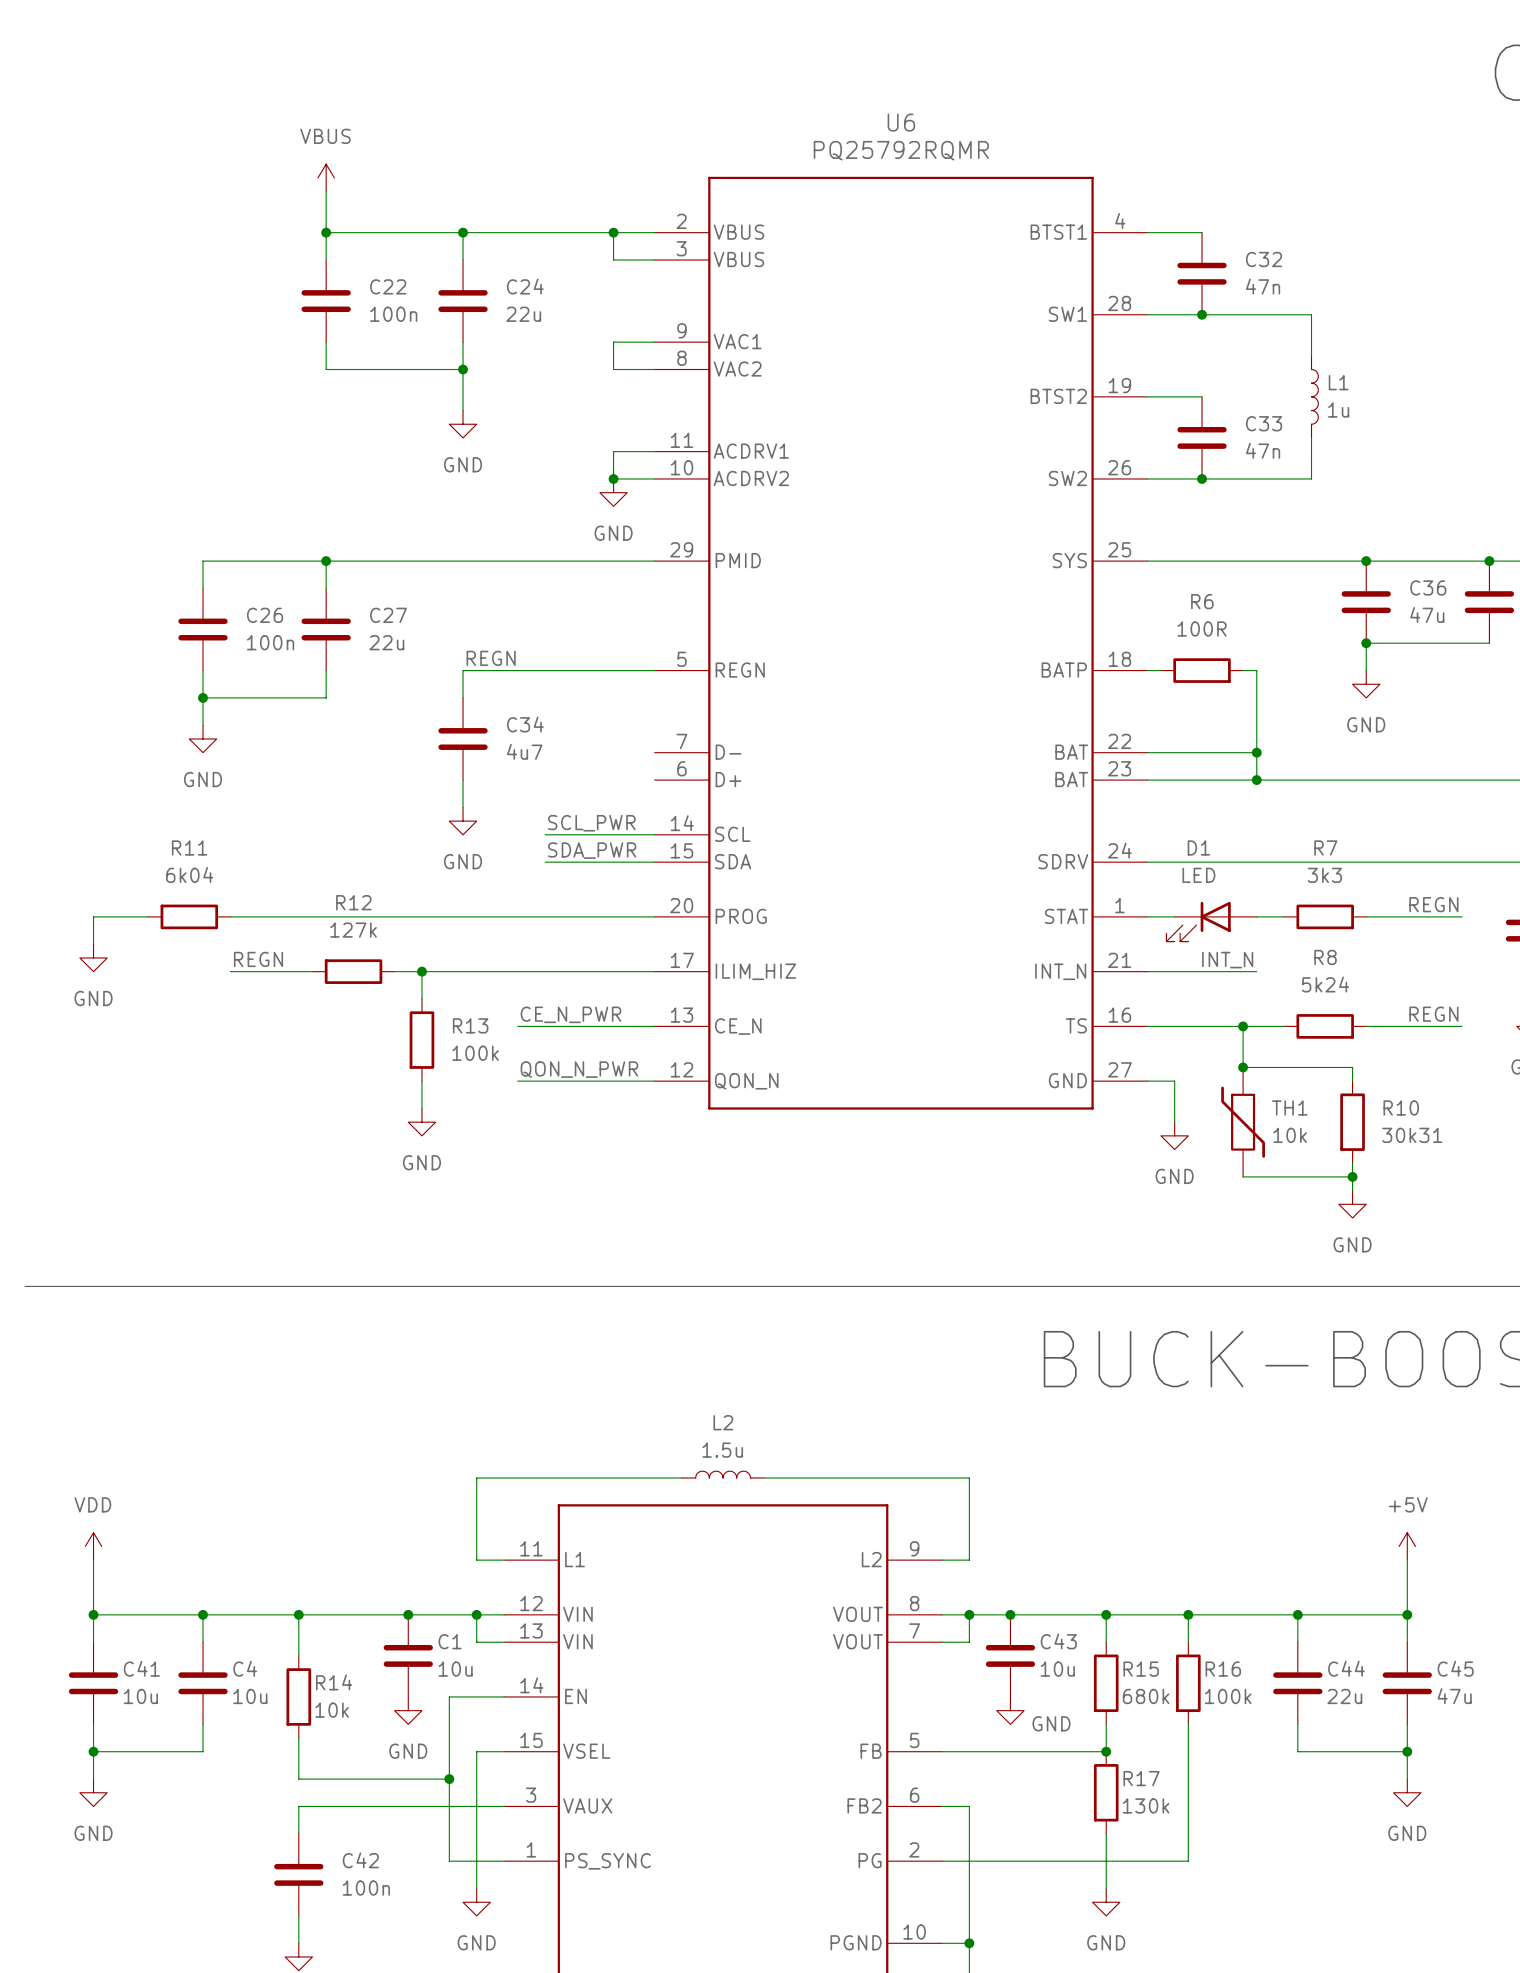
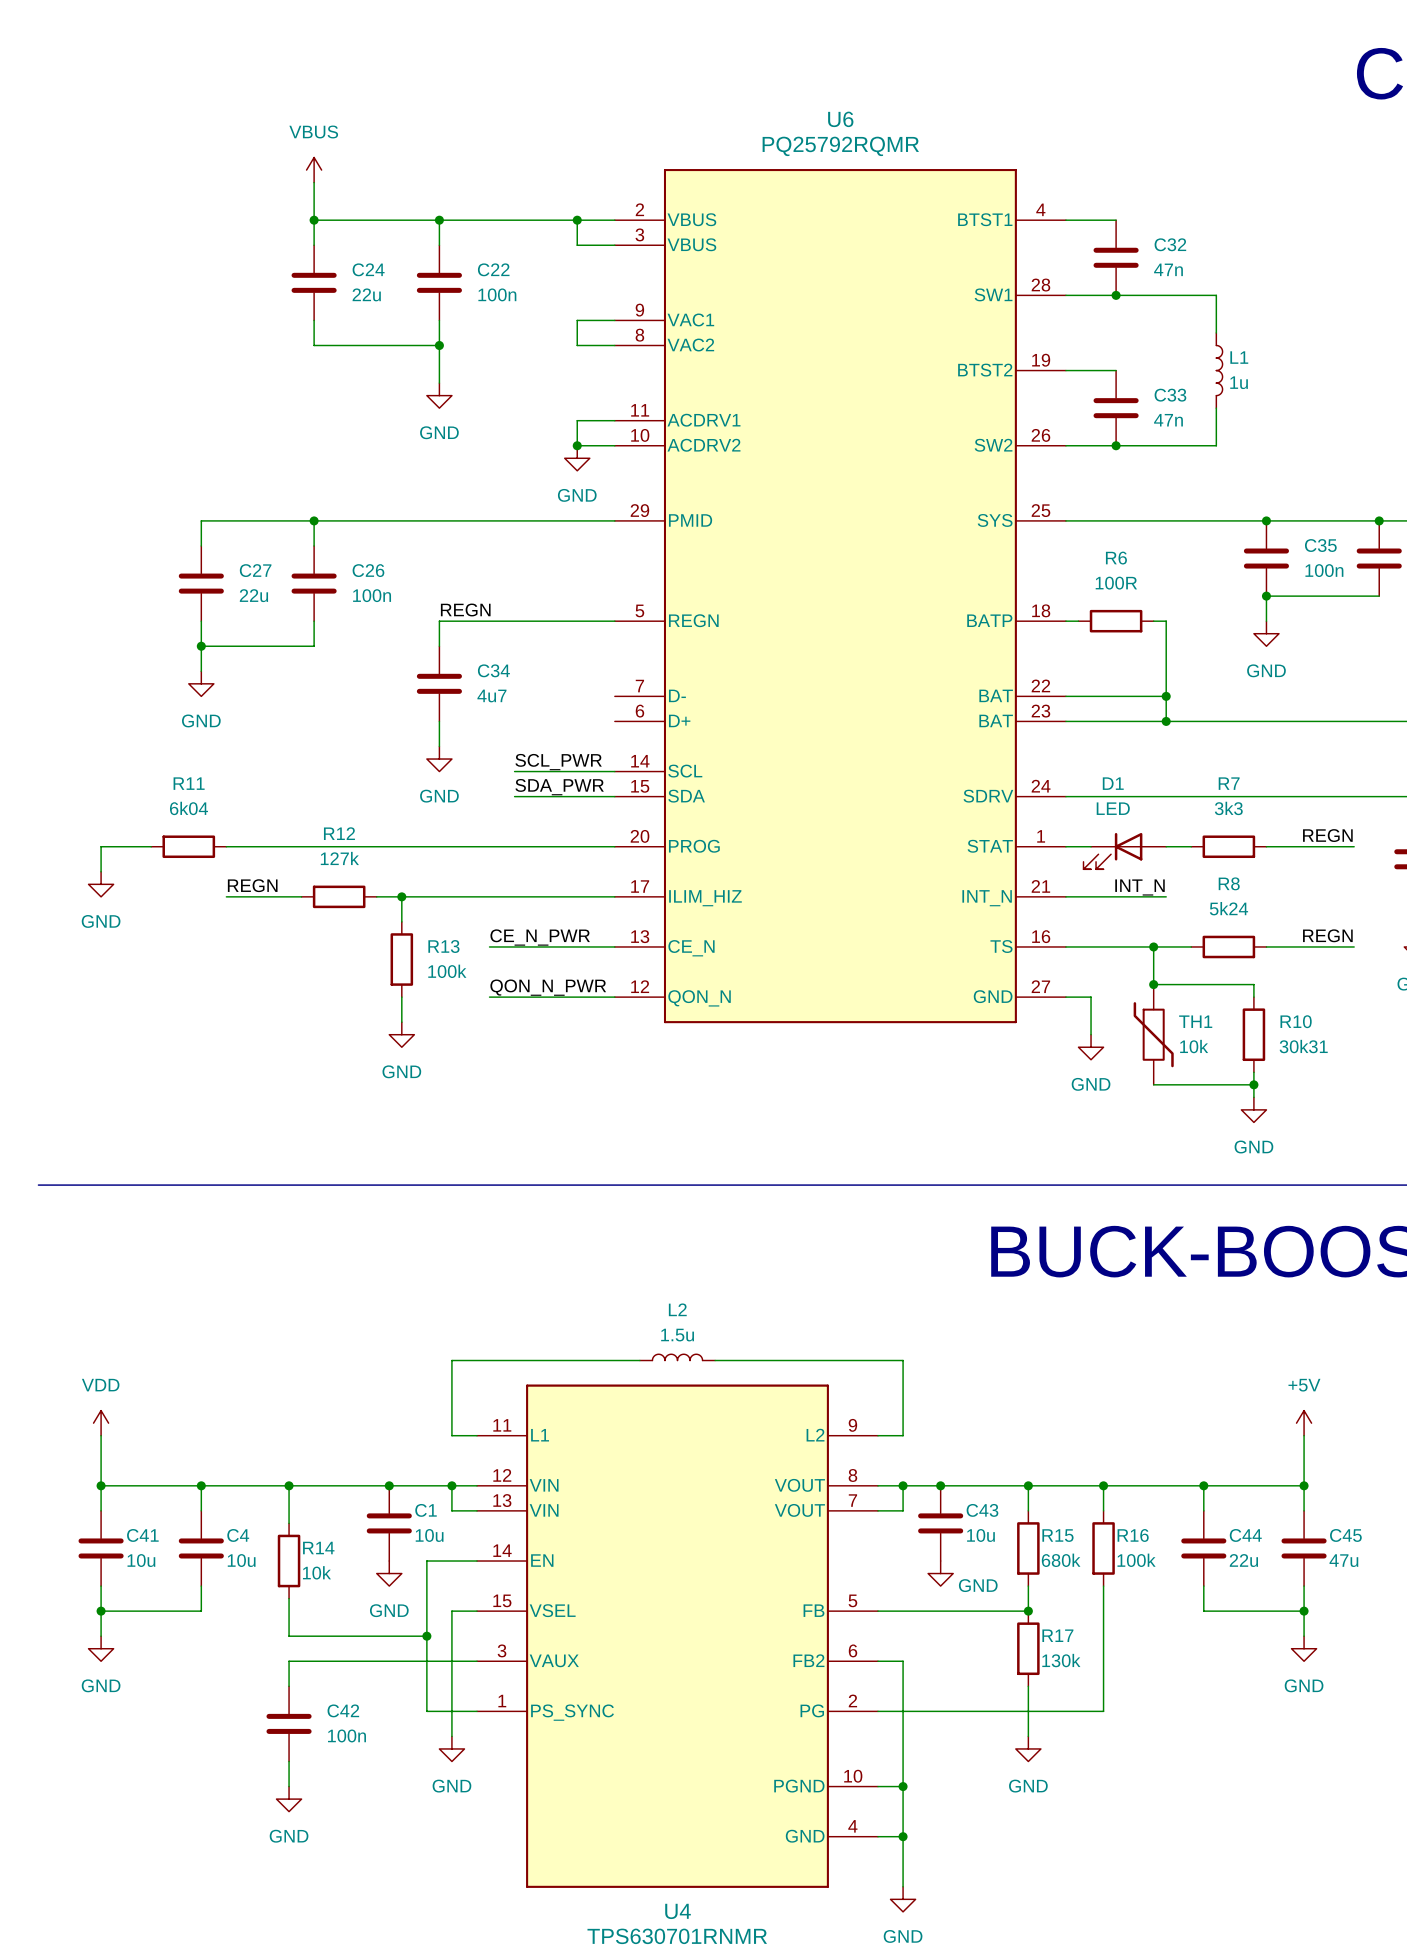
C22 name: C22 (388, 286) -> C24 (368, 269)
C24 name: C24 (525, 286) -> C22 (493, 269)
C22 value: 100n (393, 314) -> 22u (366, 294)
C24 value: 22u (523, 314) -> 100n (497, 294)
C36 name: C36 (1428, 587) -> C35 (1320, 545)
C26 name: C26 (265, 615) -> C27 (255, 570)
C27 name: C27 (388, 615) -> C26 (368, 570)
C36 value: 47u (1427, 615) -> 100n (1324, 570)
C26 value: 100n (270, 642) -> 22u (253, 595)
C27 value: 22u (386, 642) -> 100n (372, 595)

